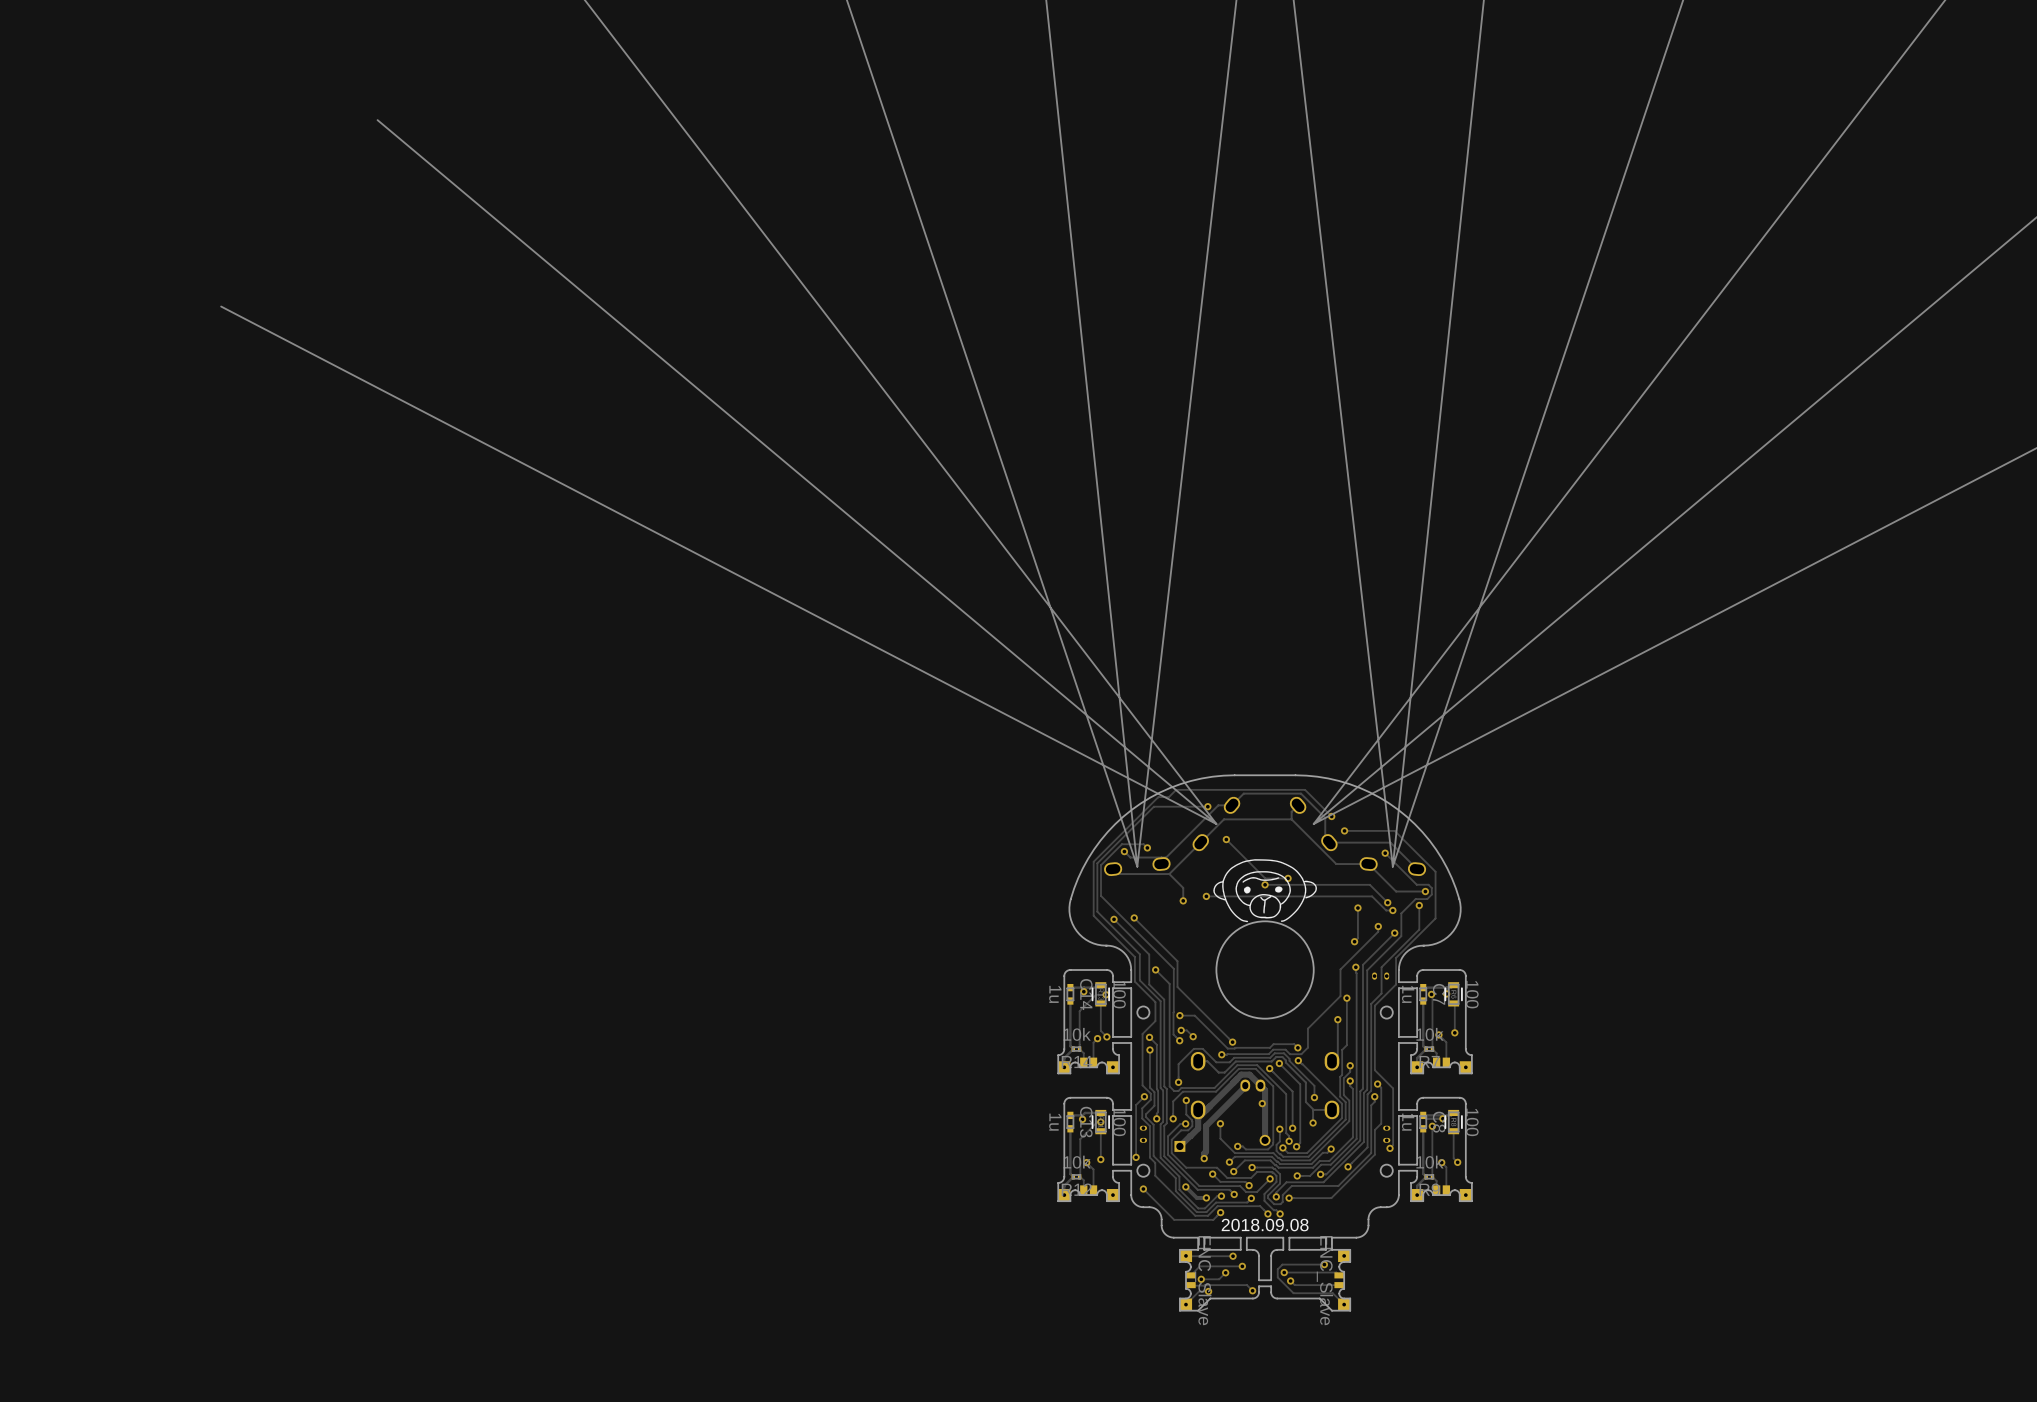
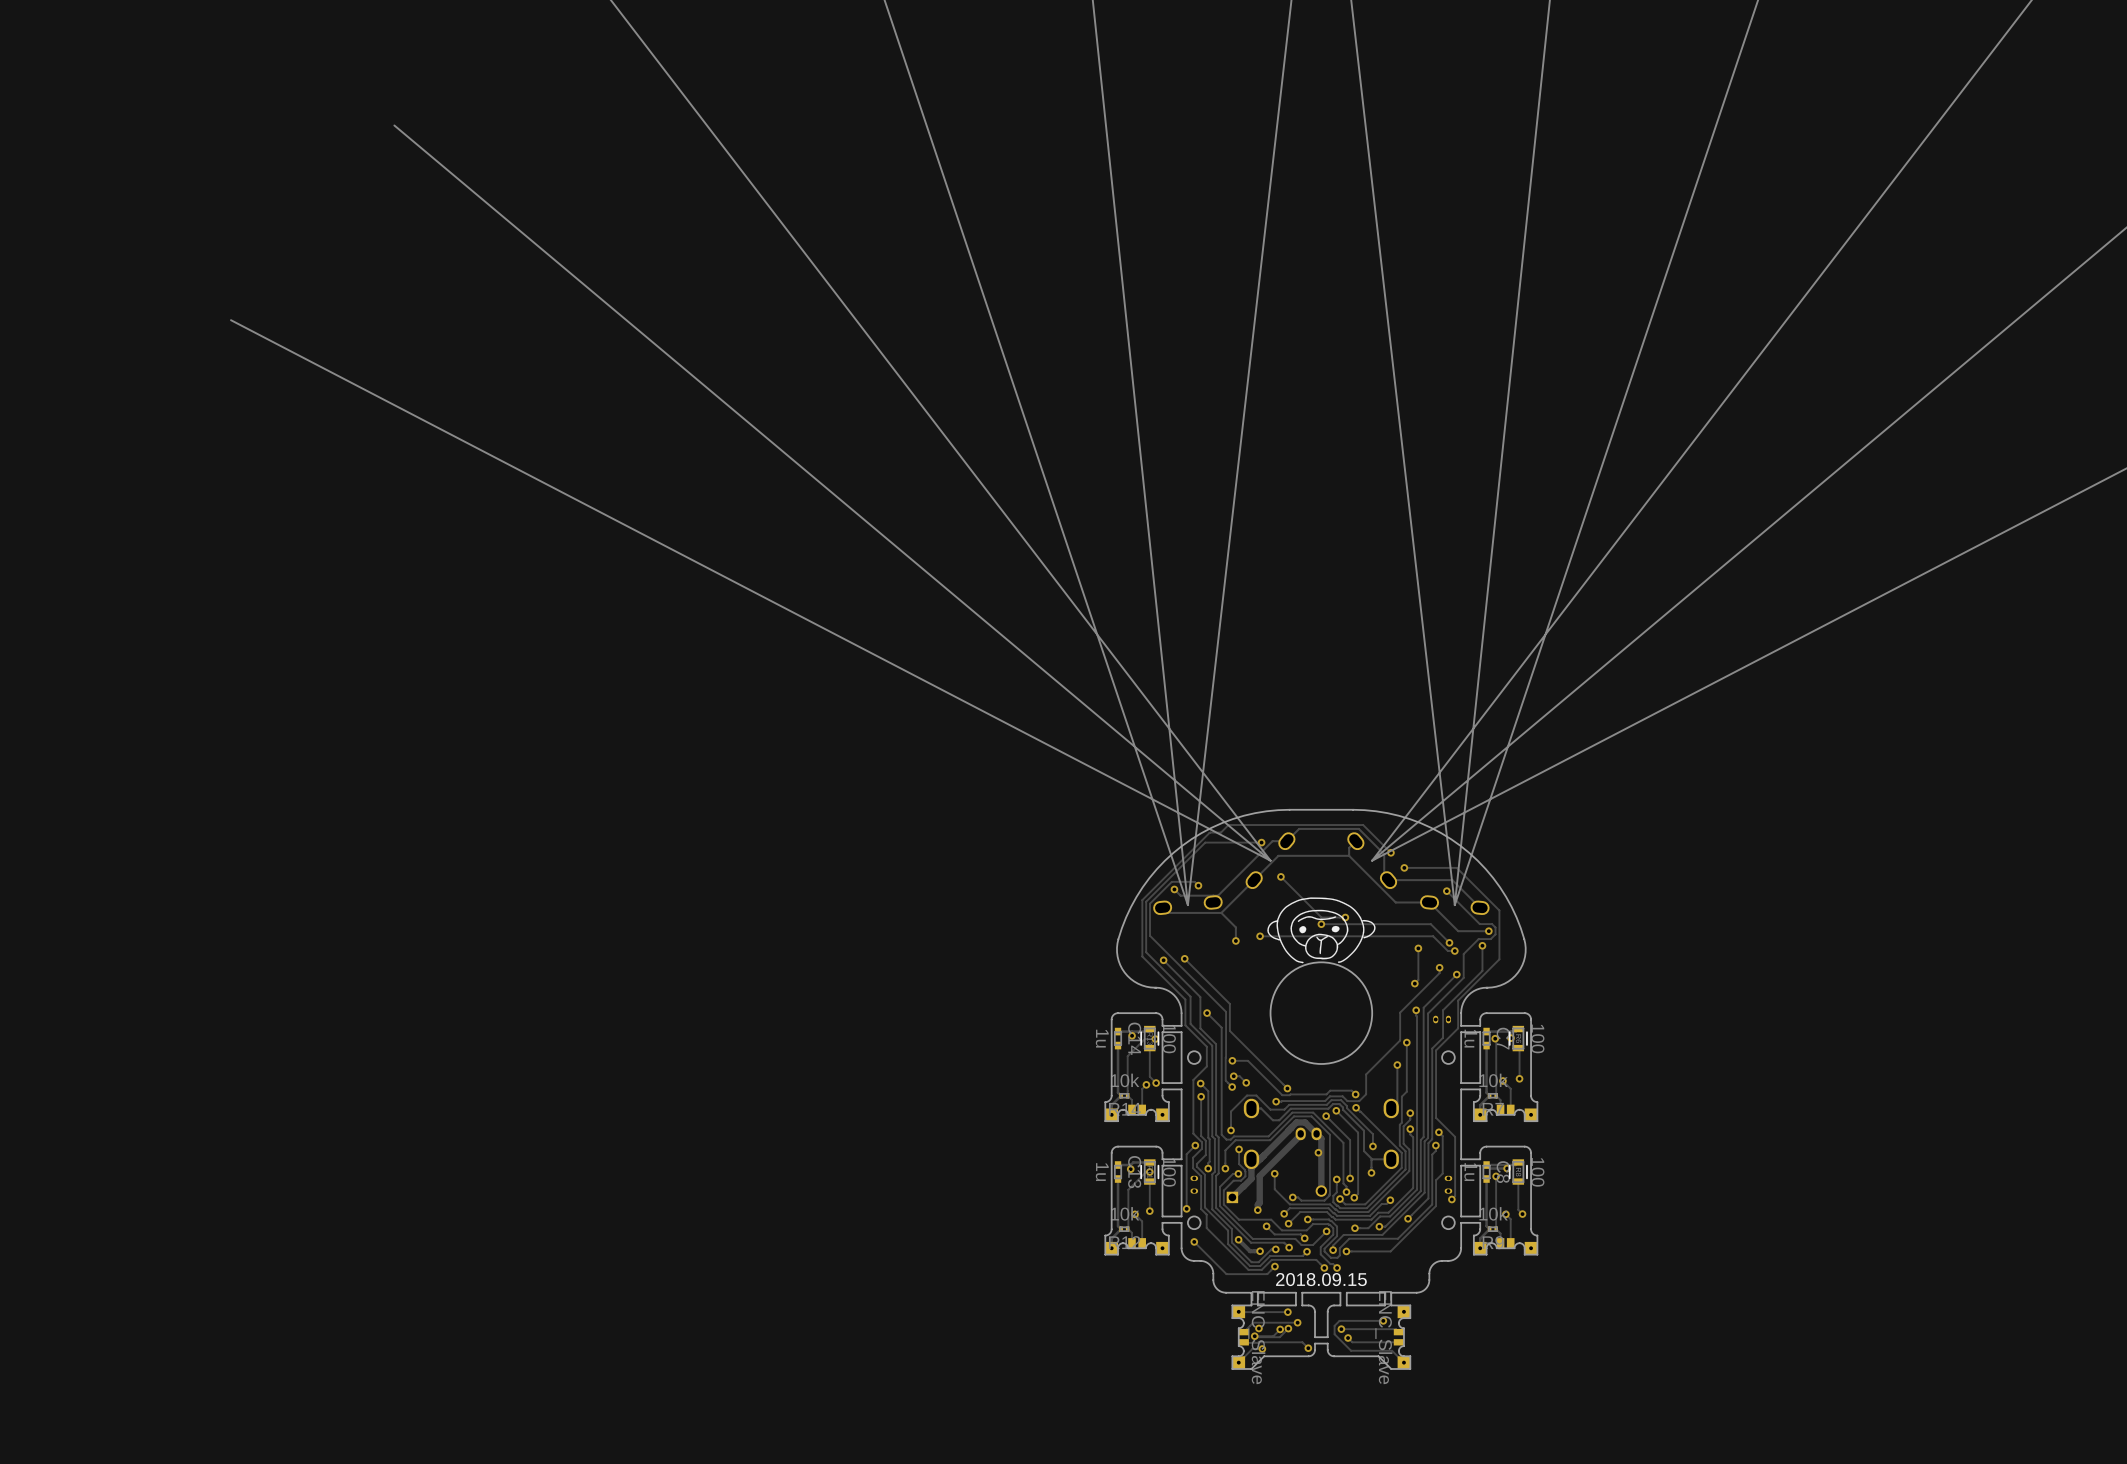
text: 2018.09.08 (1265, 1225) -> 2018.09.15 (1321, 1279)
via: none -> (1258, 1328)
track: none -> (1288, 1328) (1279, 1337) (1254, 1337)
via: none -> (1288, 1328)

